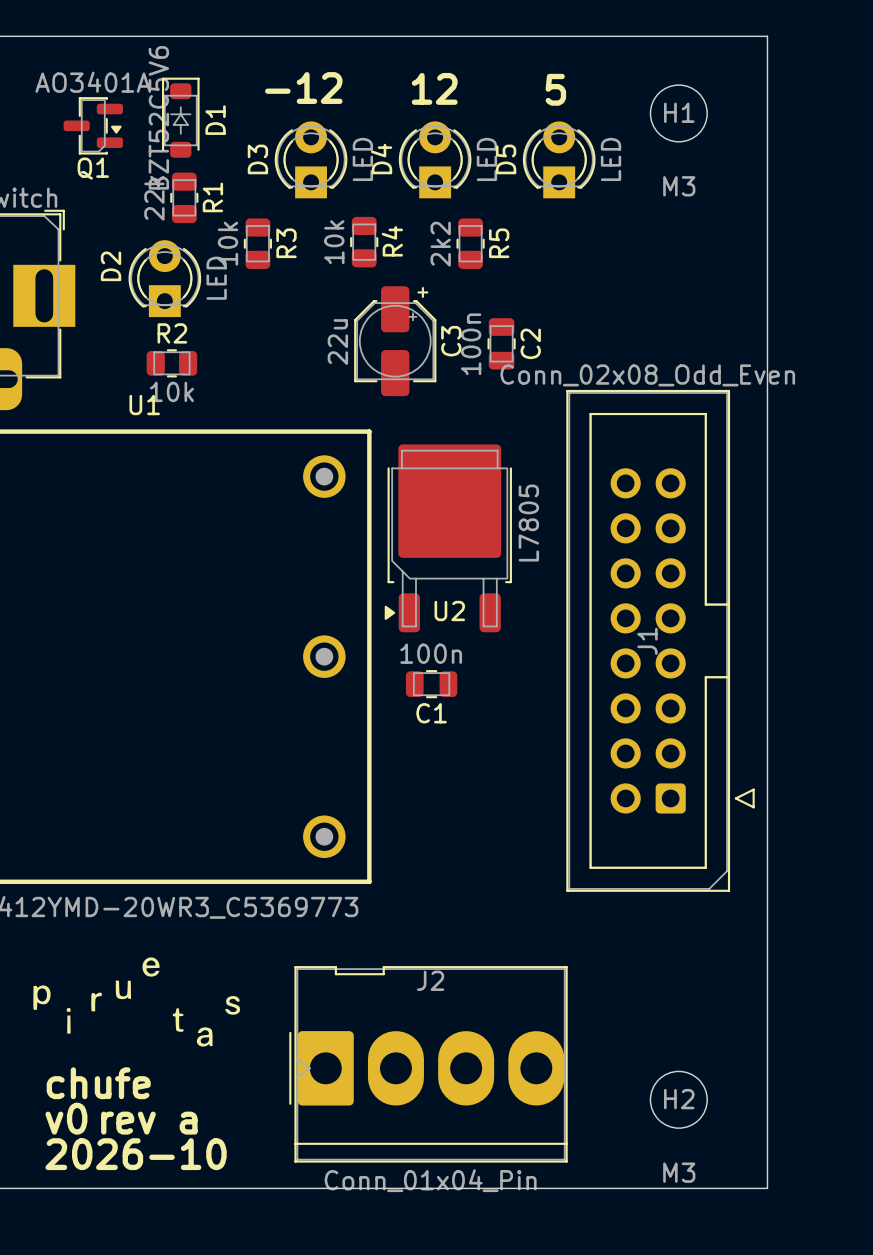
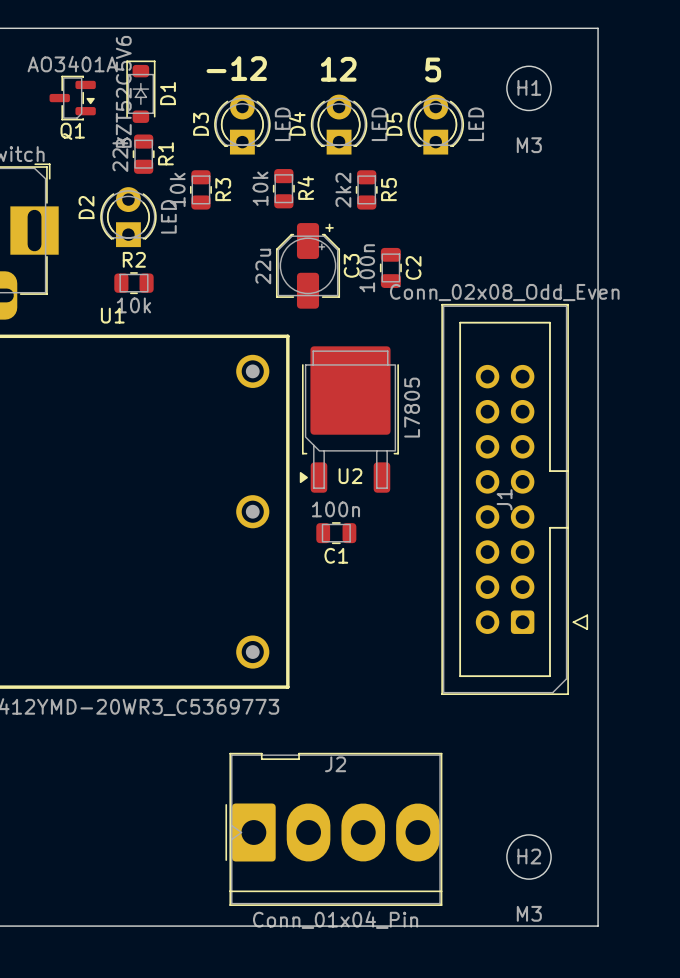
drawing: [33, 957, 160, 1034] -> none
drawing: [172, 996, 241, 1047] -> none
text: chufe (98, 1083) -> none
text: v0 (66, 1118) -> none
text: rev a (149, 1123) -> none
text: 2026-10 (136, 1154) -> none

